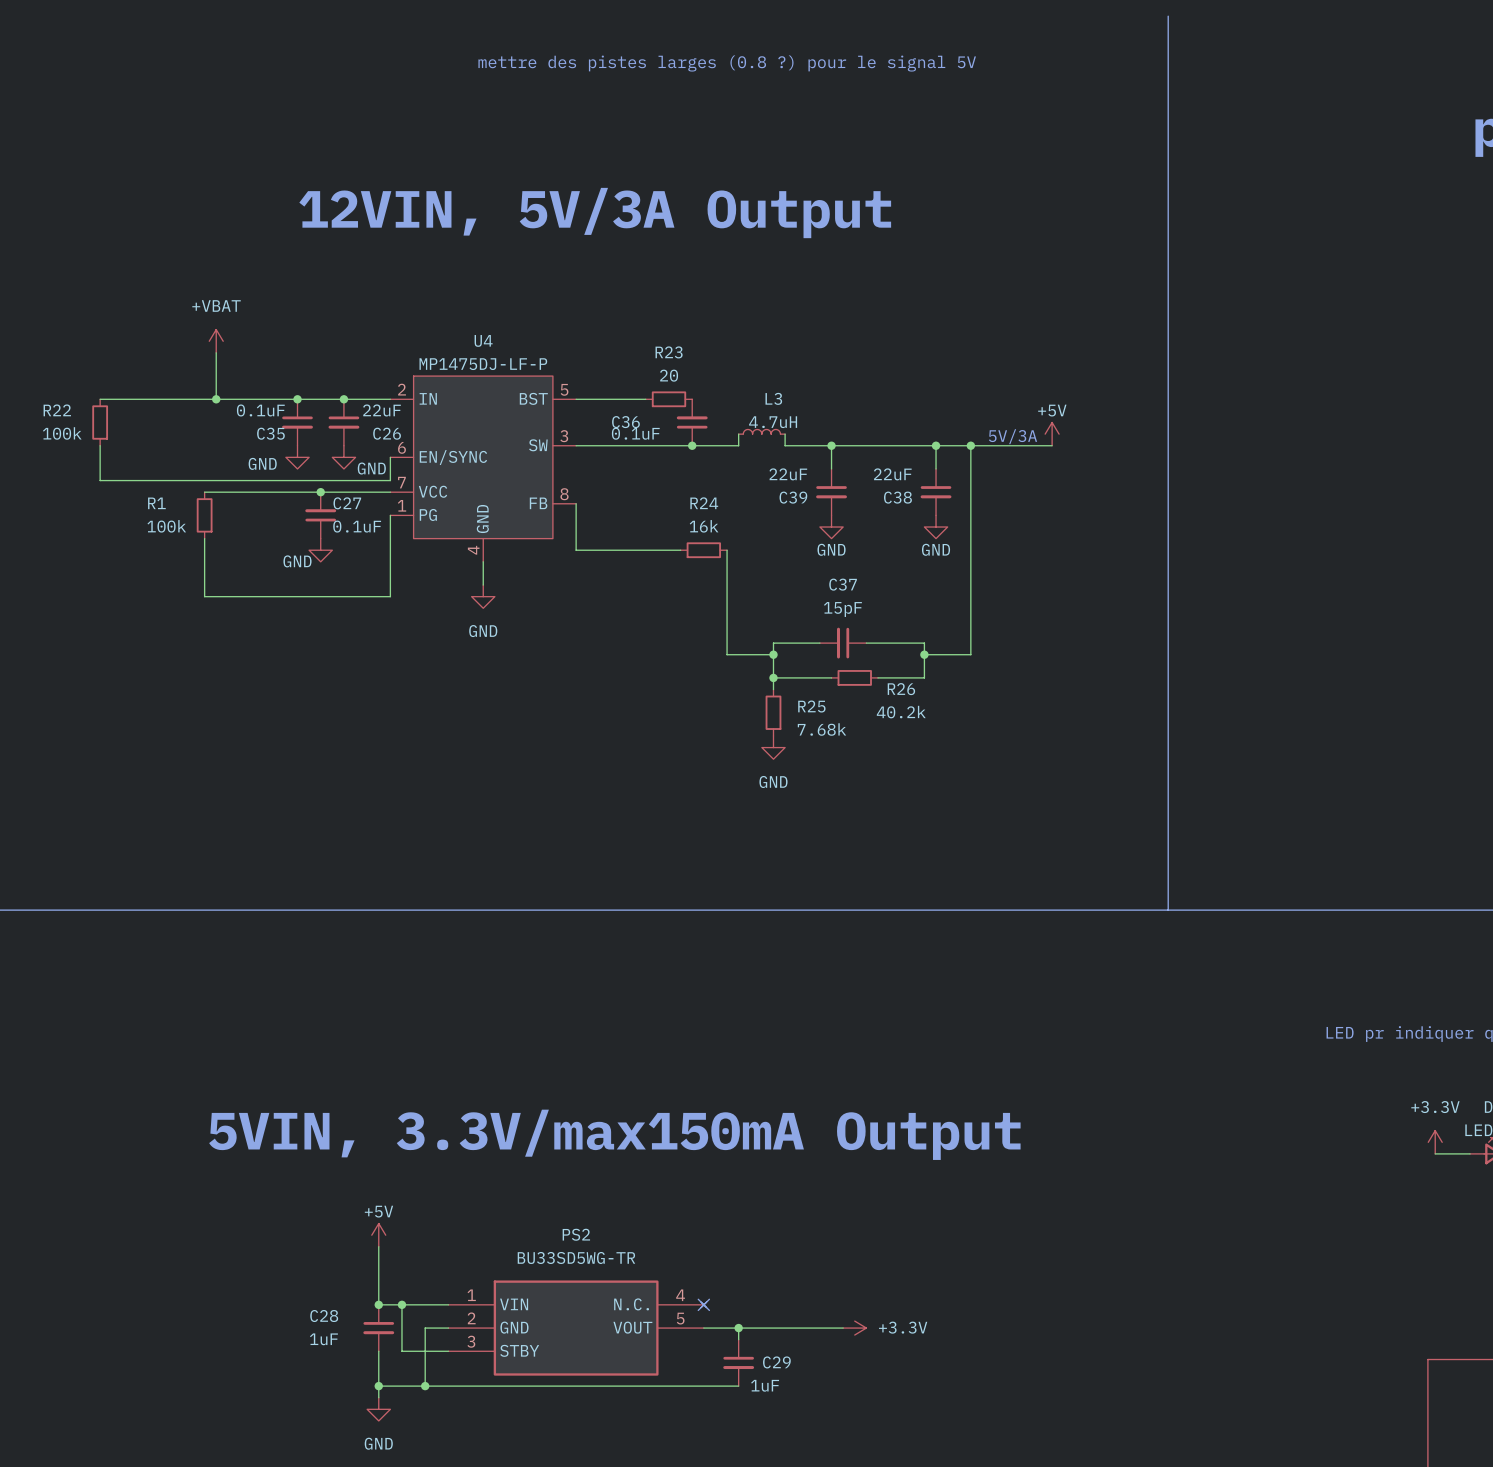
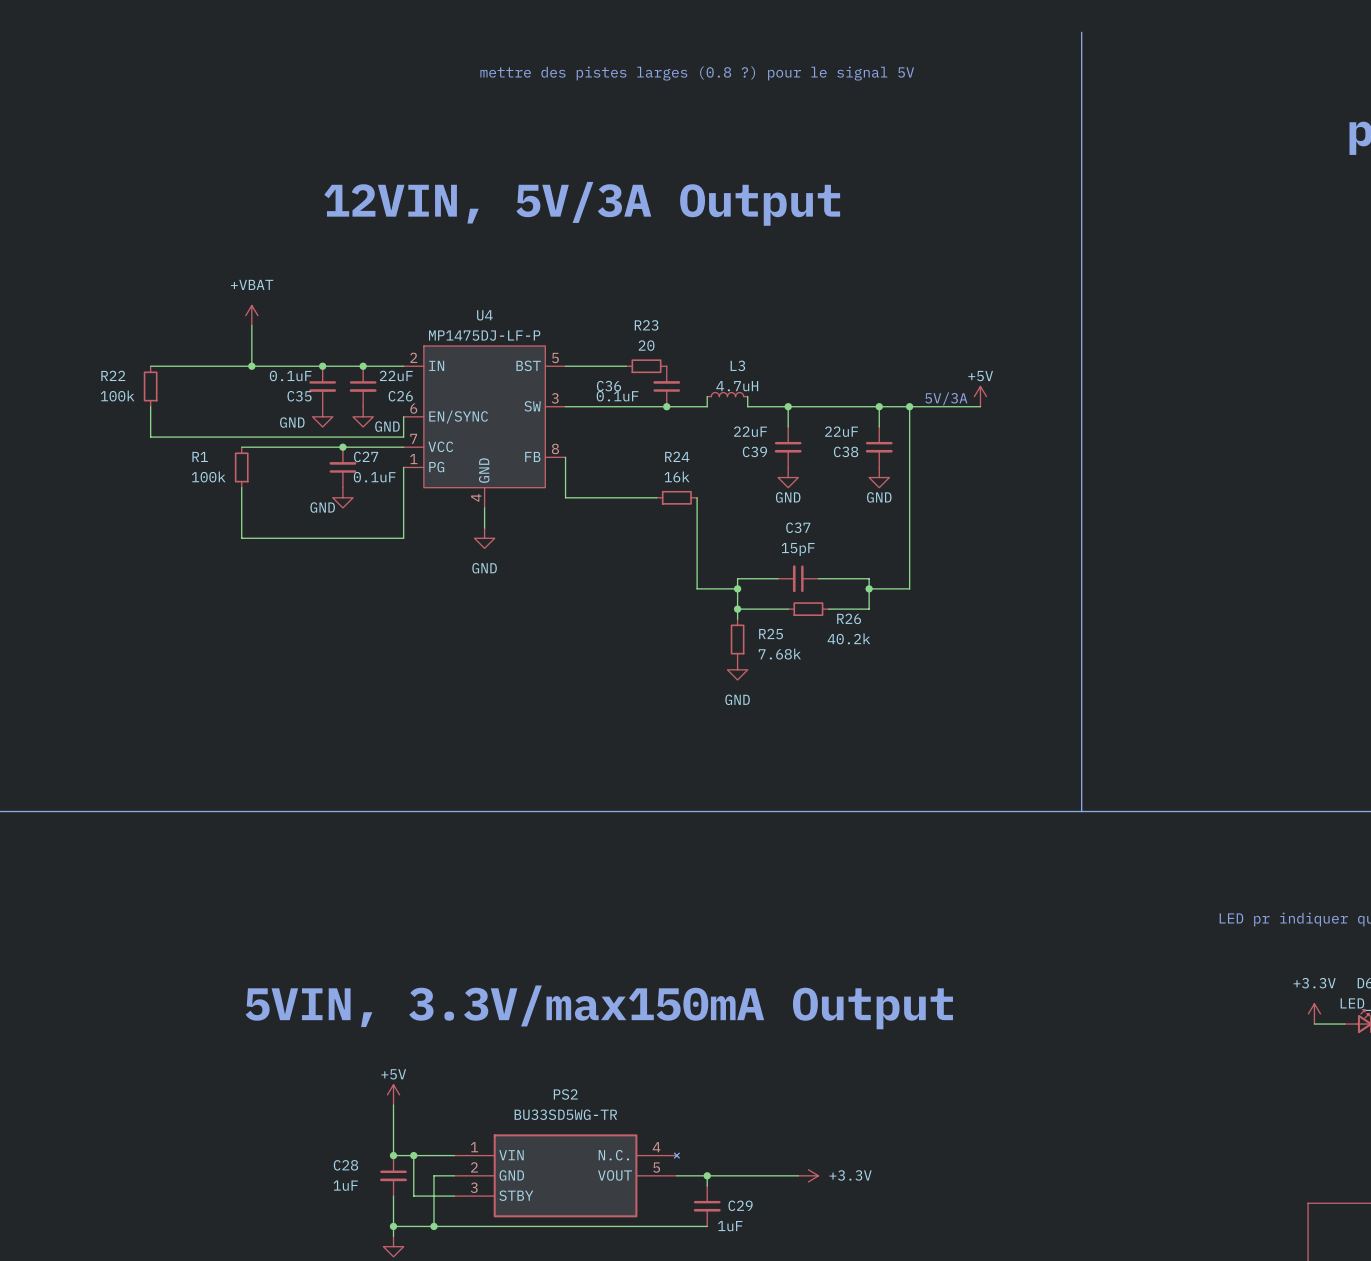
no-connect mark: (703, 1304) -> none

